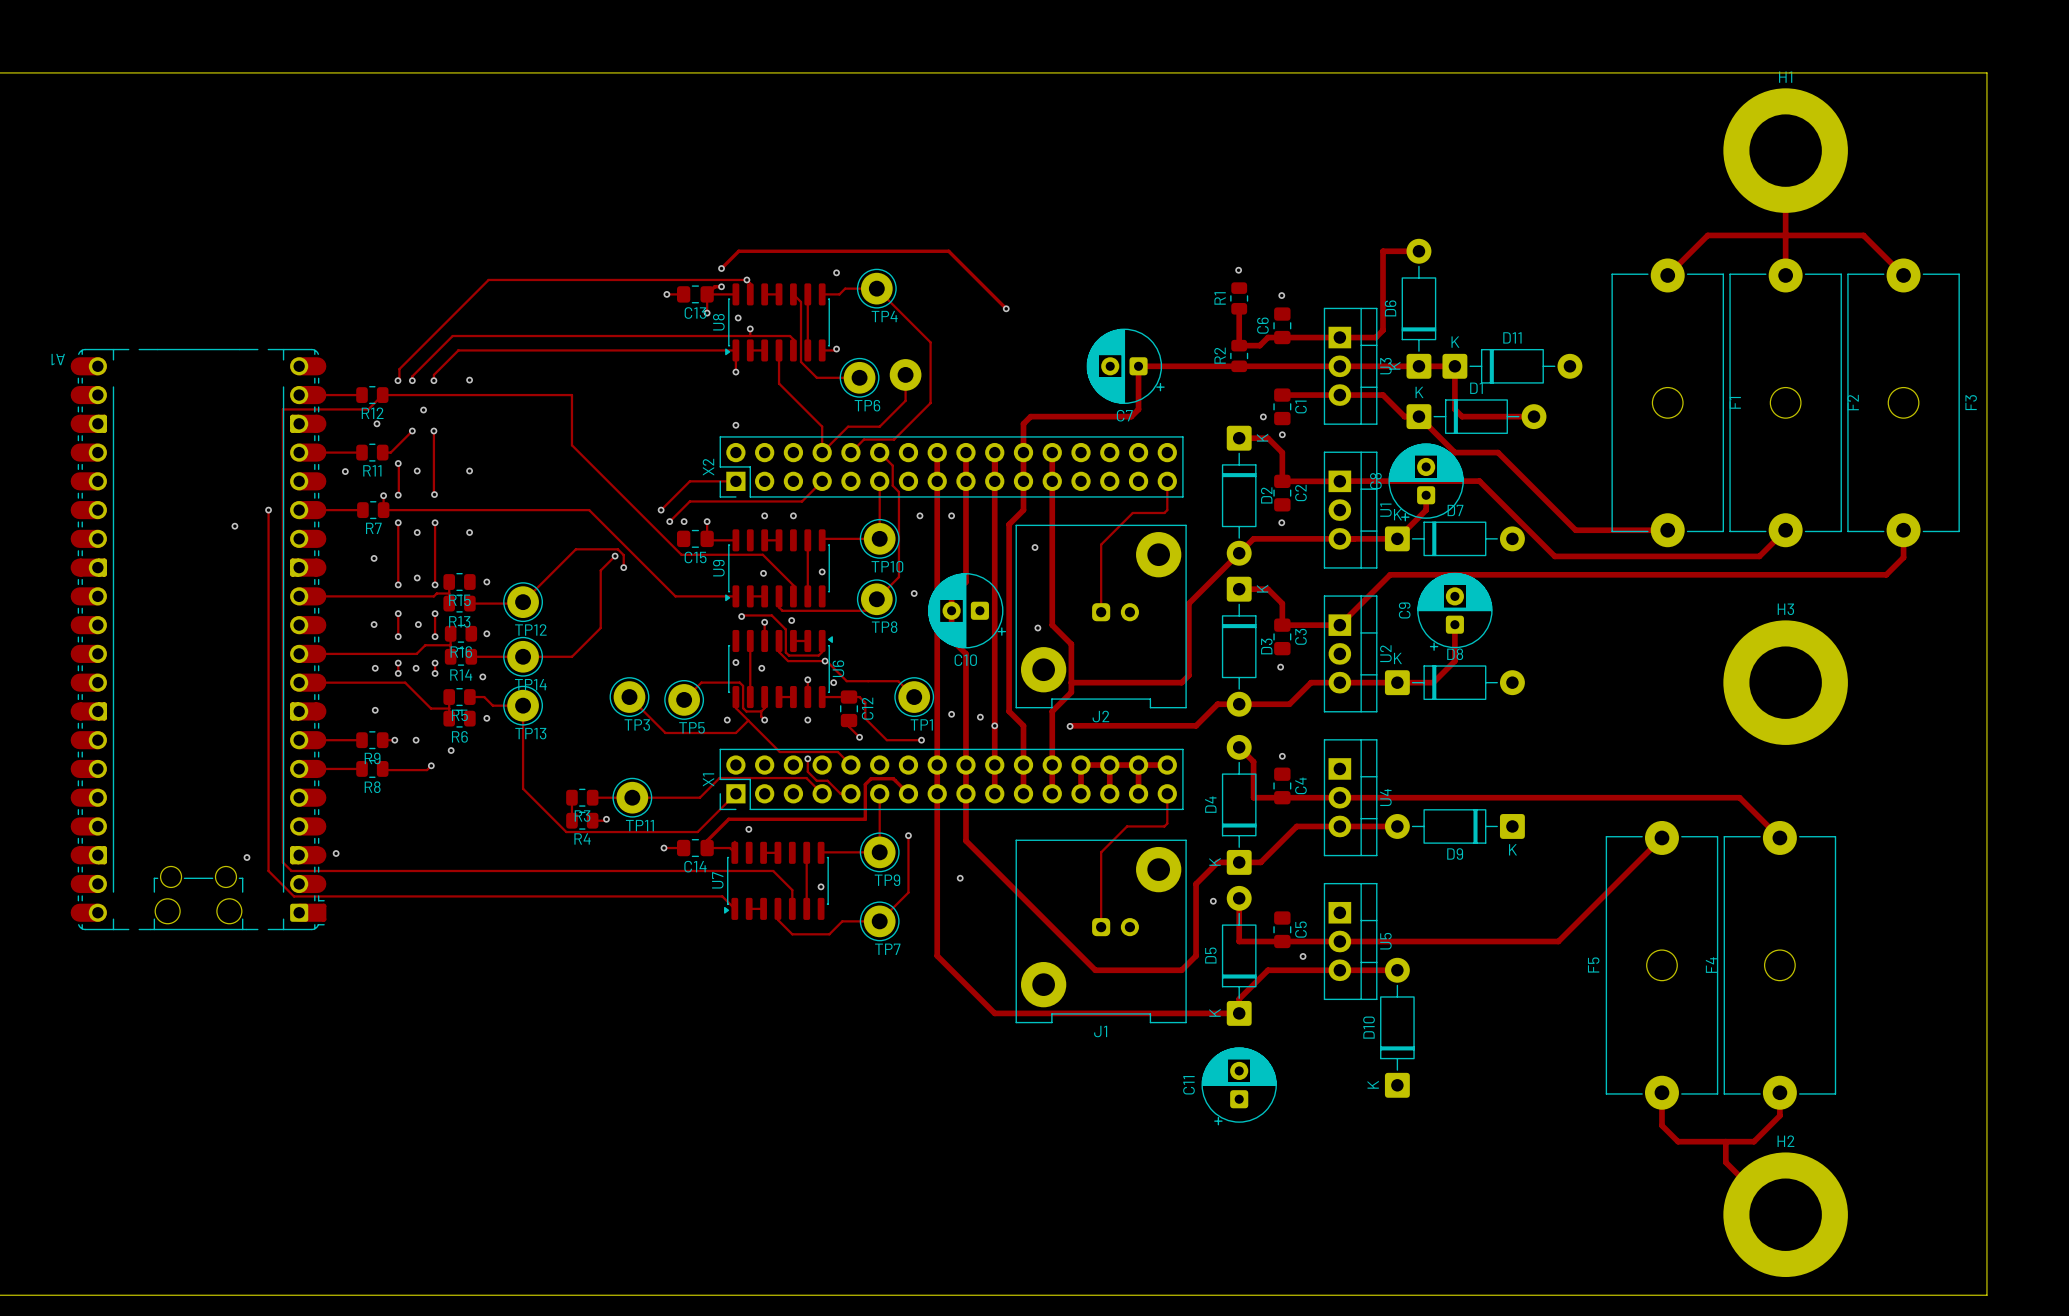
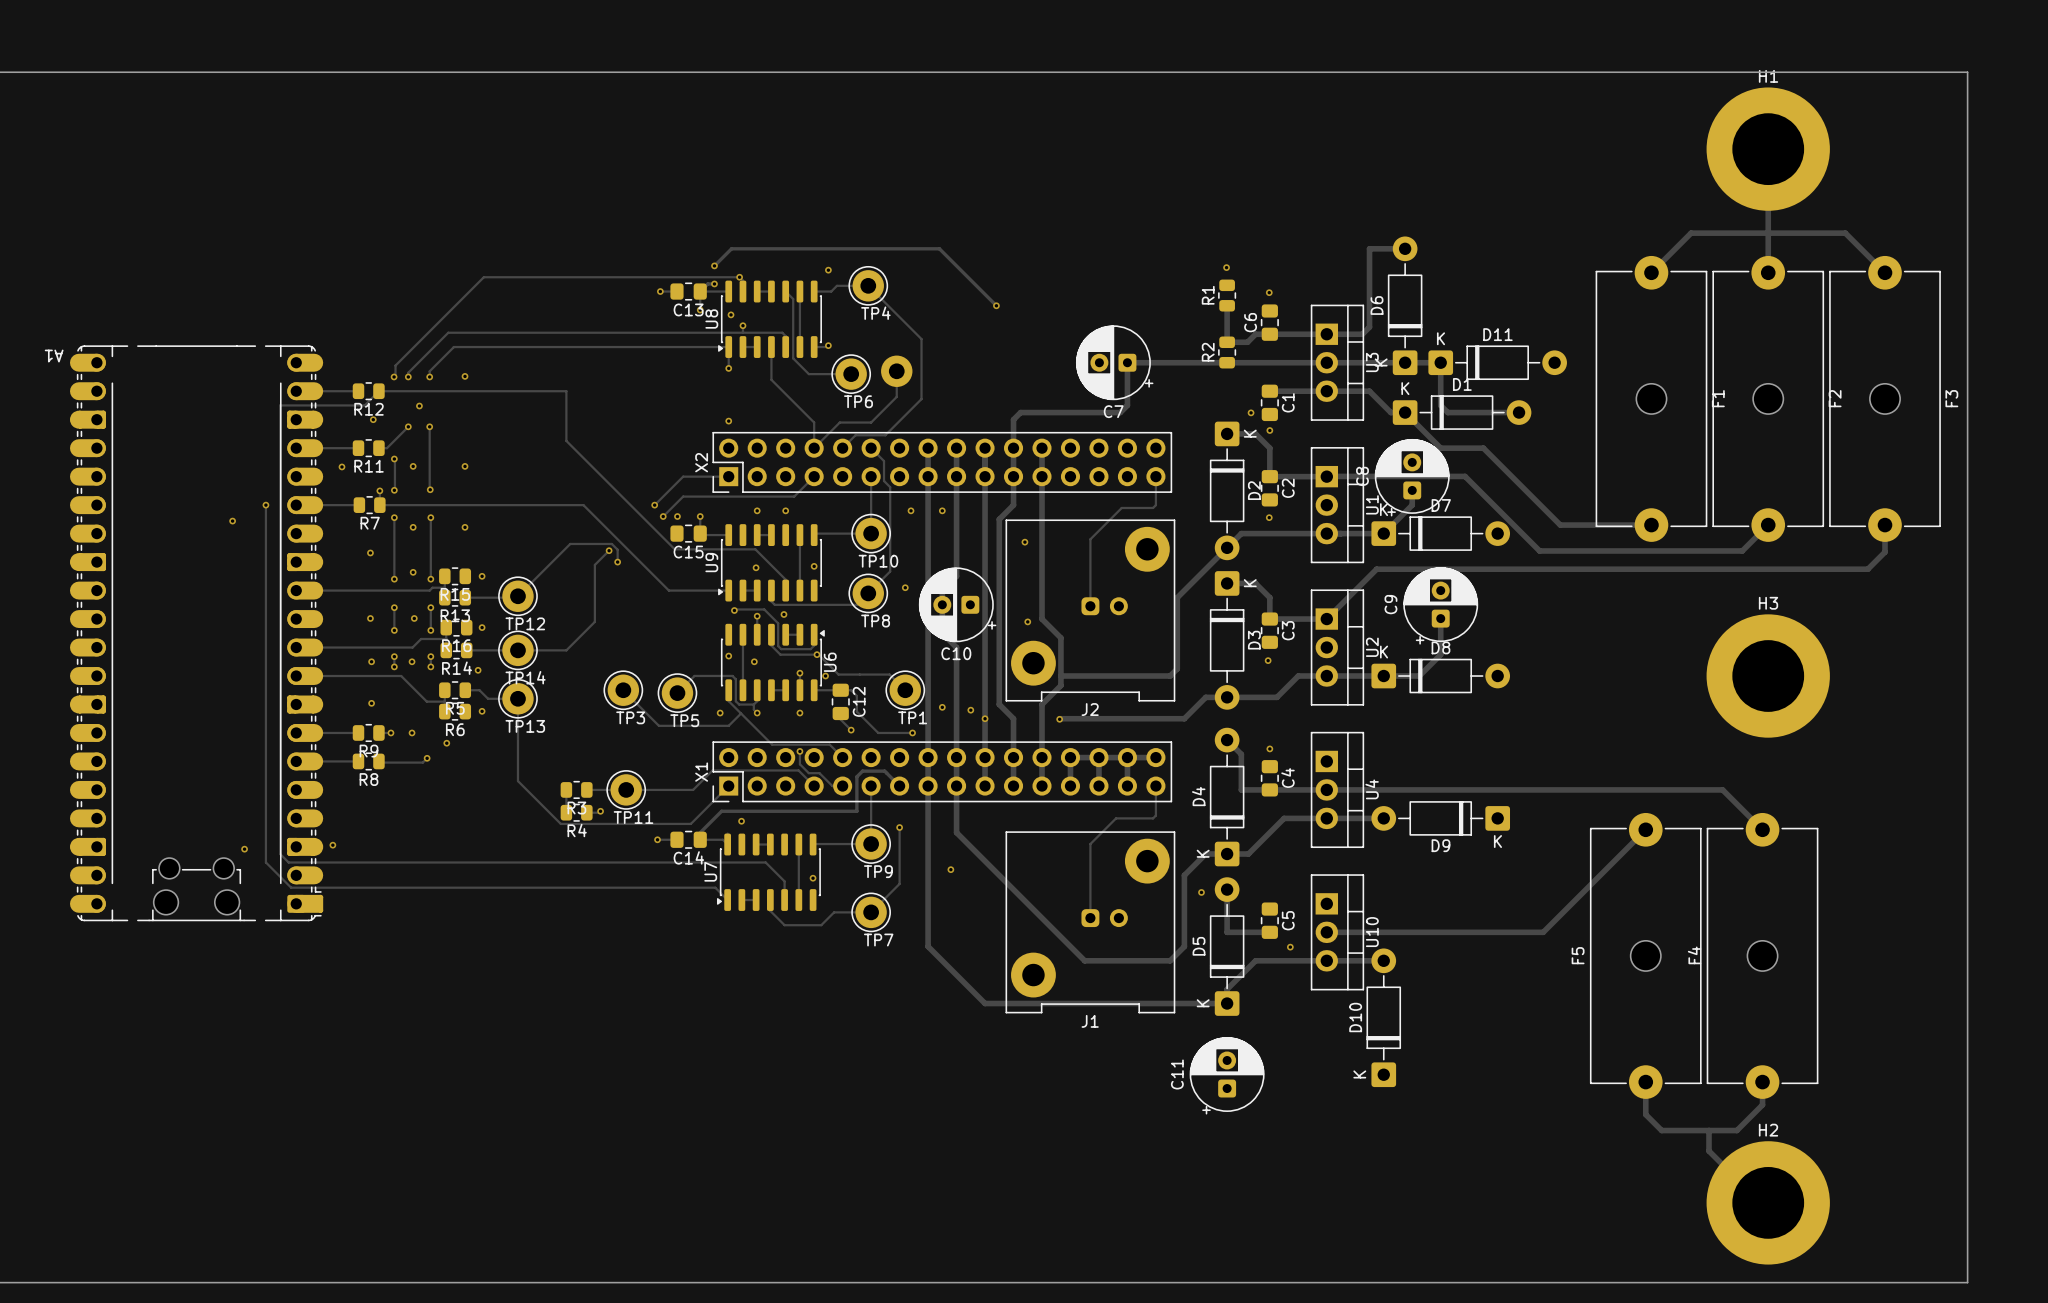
track: (1282, 941) (1339, 941) -> none
U5 name: U5 (1385, 941) -> U10 (1372, 932)

